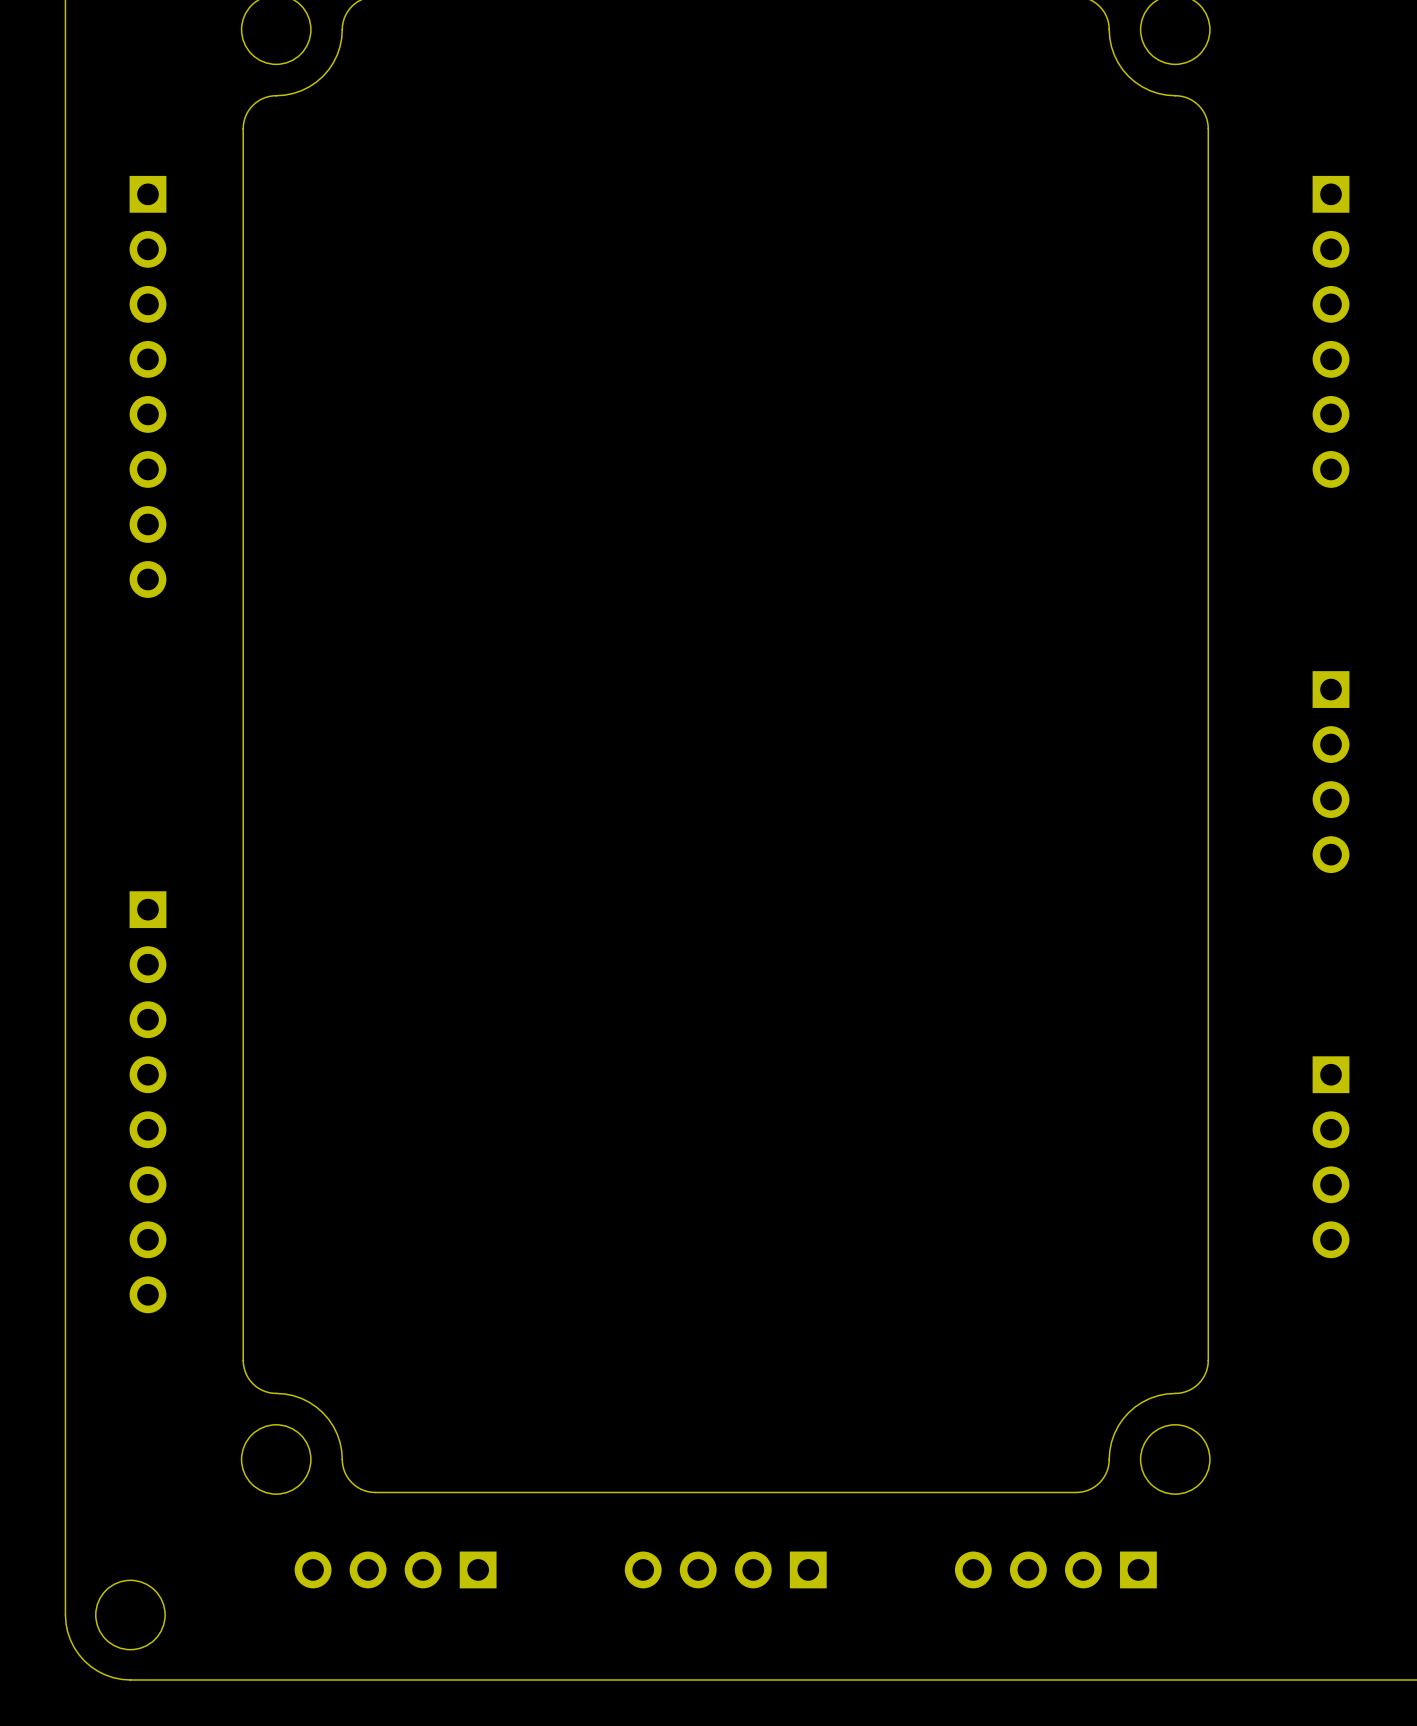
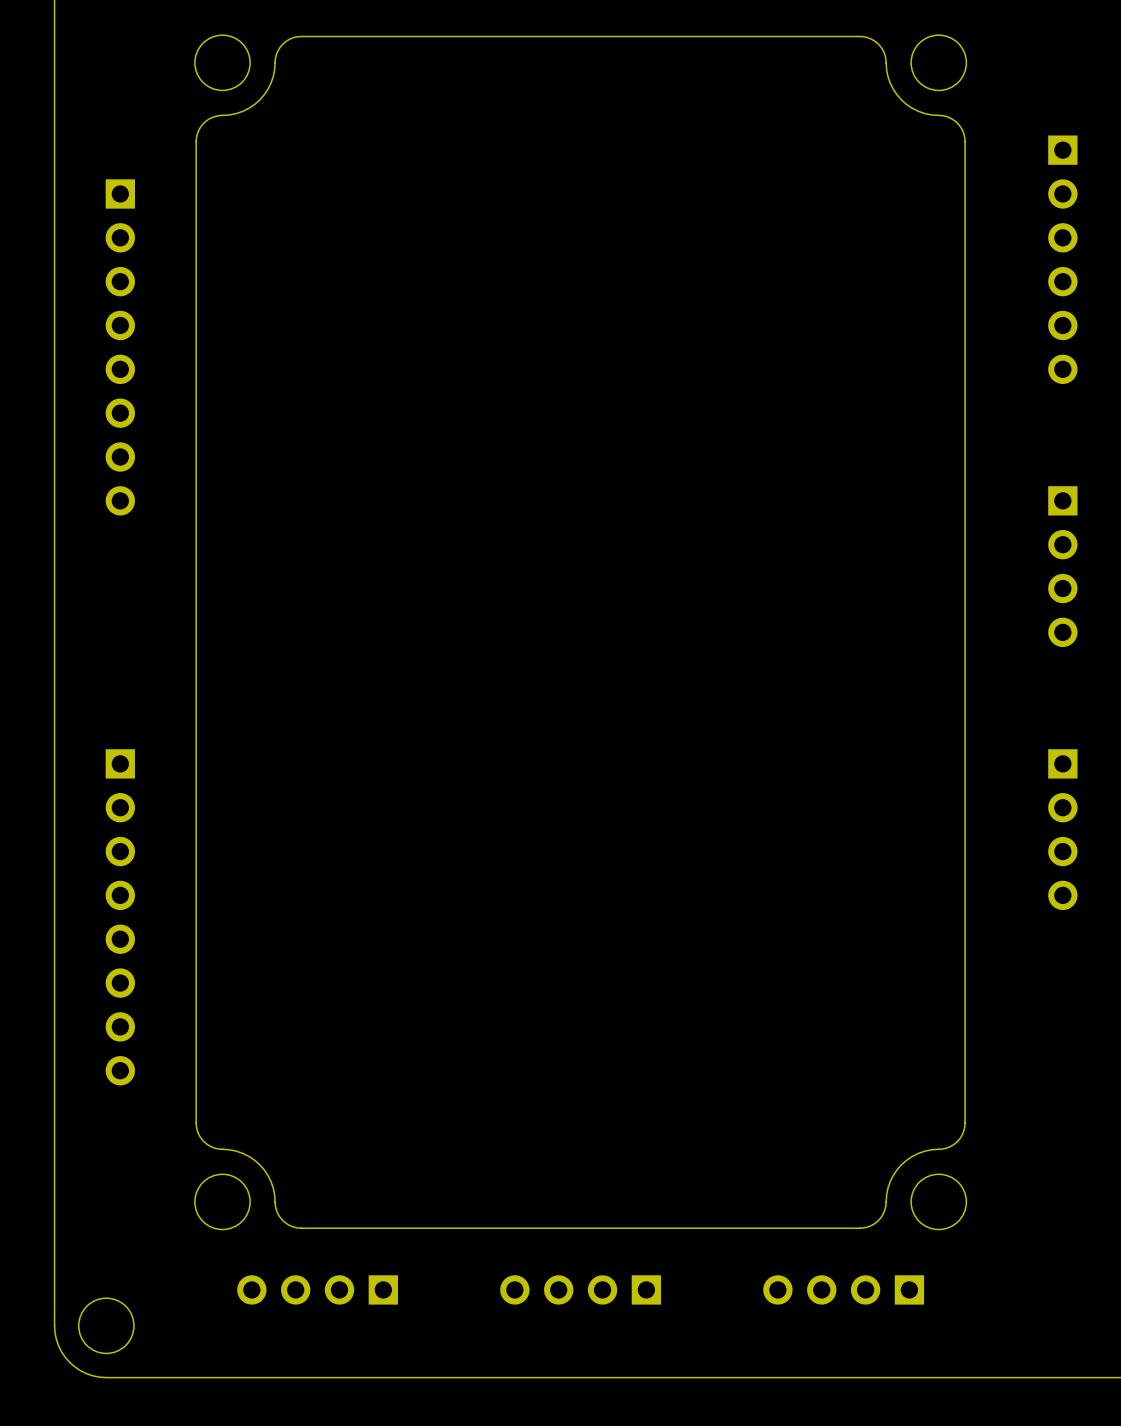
part position: (1331, 331) -> (1062, 259)
part: none -> (1062, 566)
part: (1331, 772) -> none
part: none -> (1062, 829)
part: (1331, 1157) -> none

